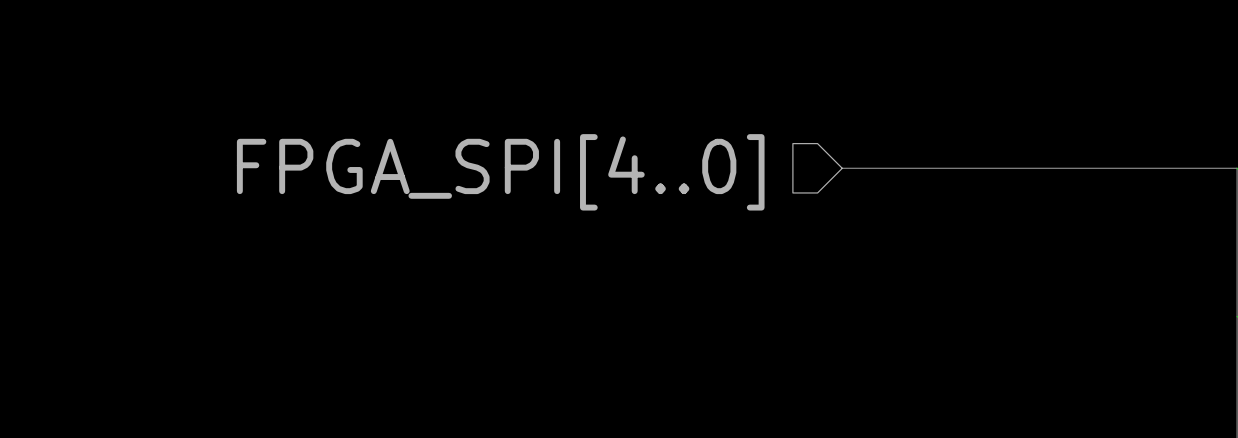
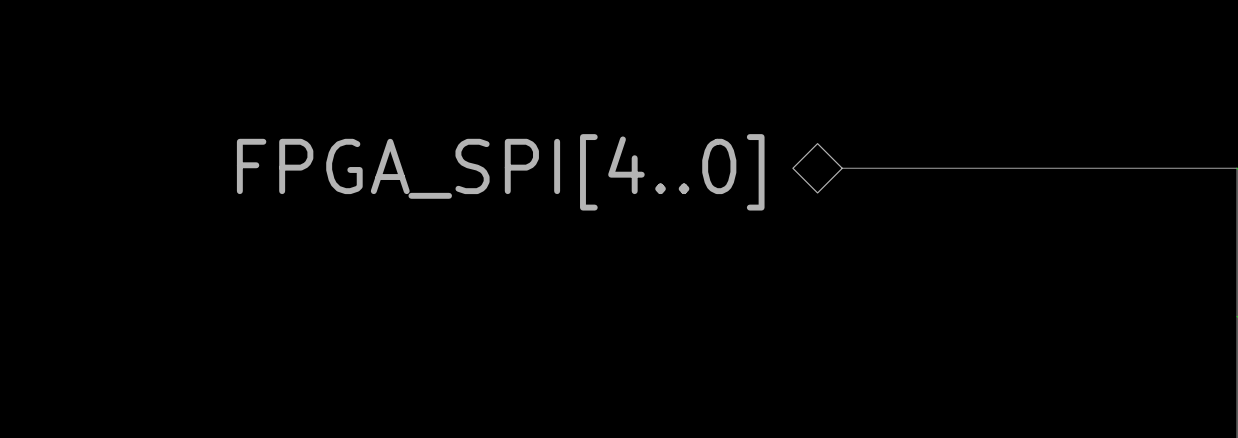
hierarchical label shape: input (500, 172) -> bidirectional (500, 172)

